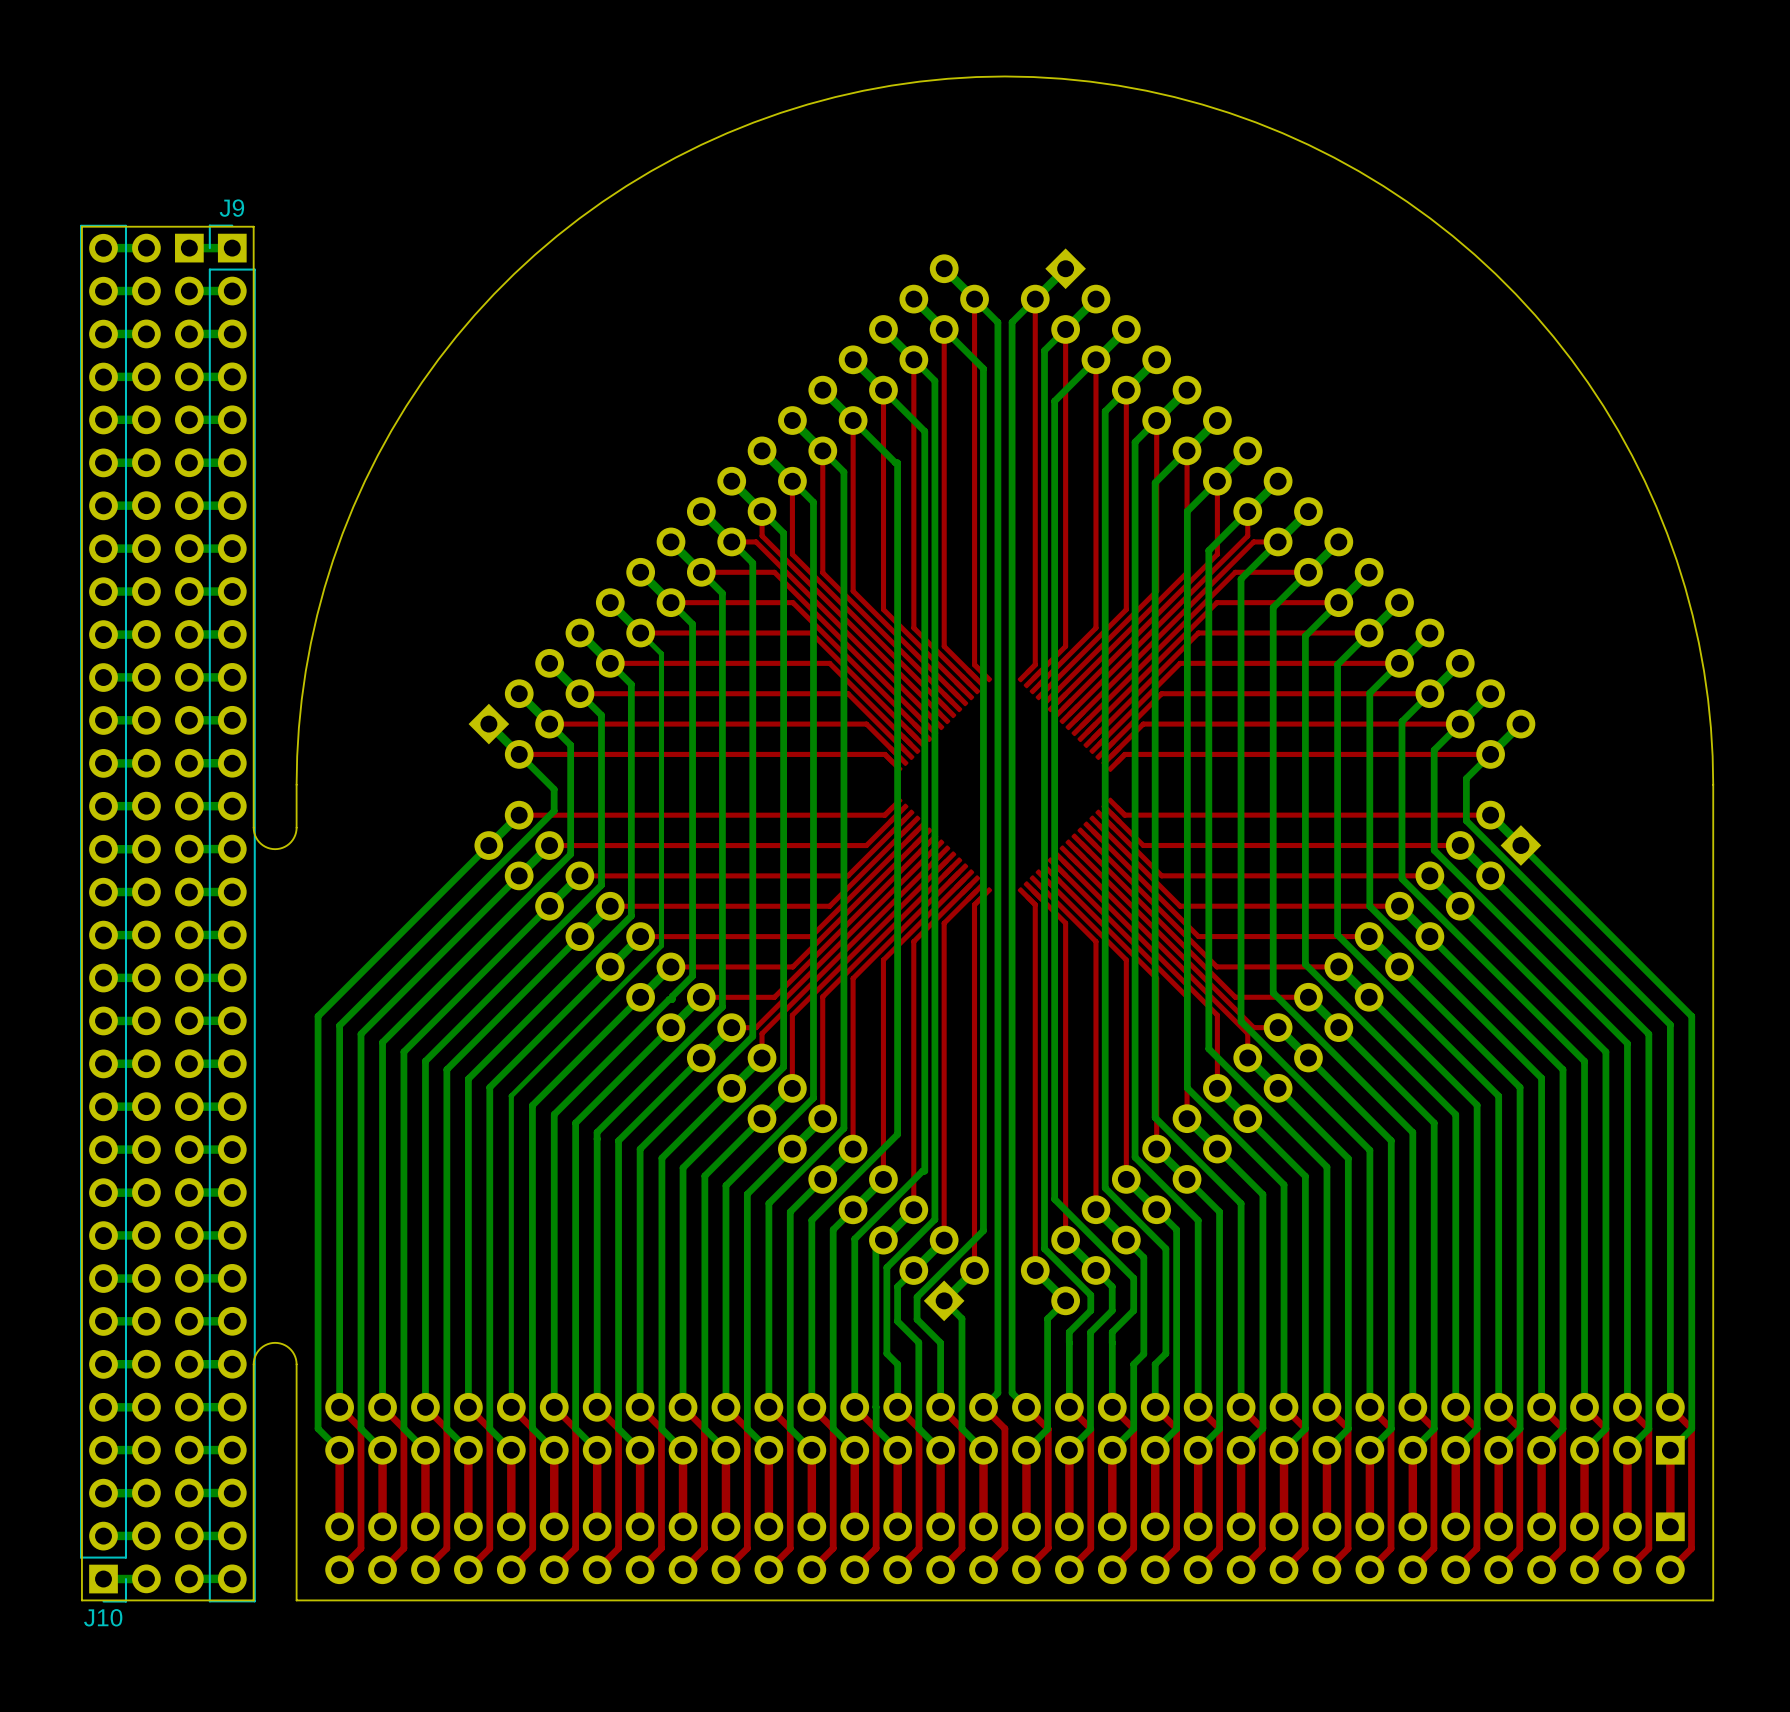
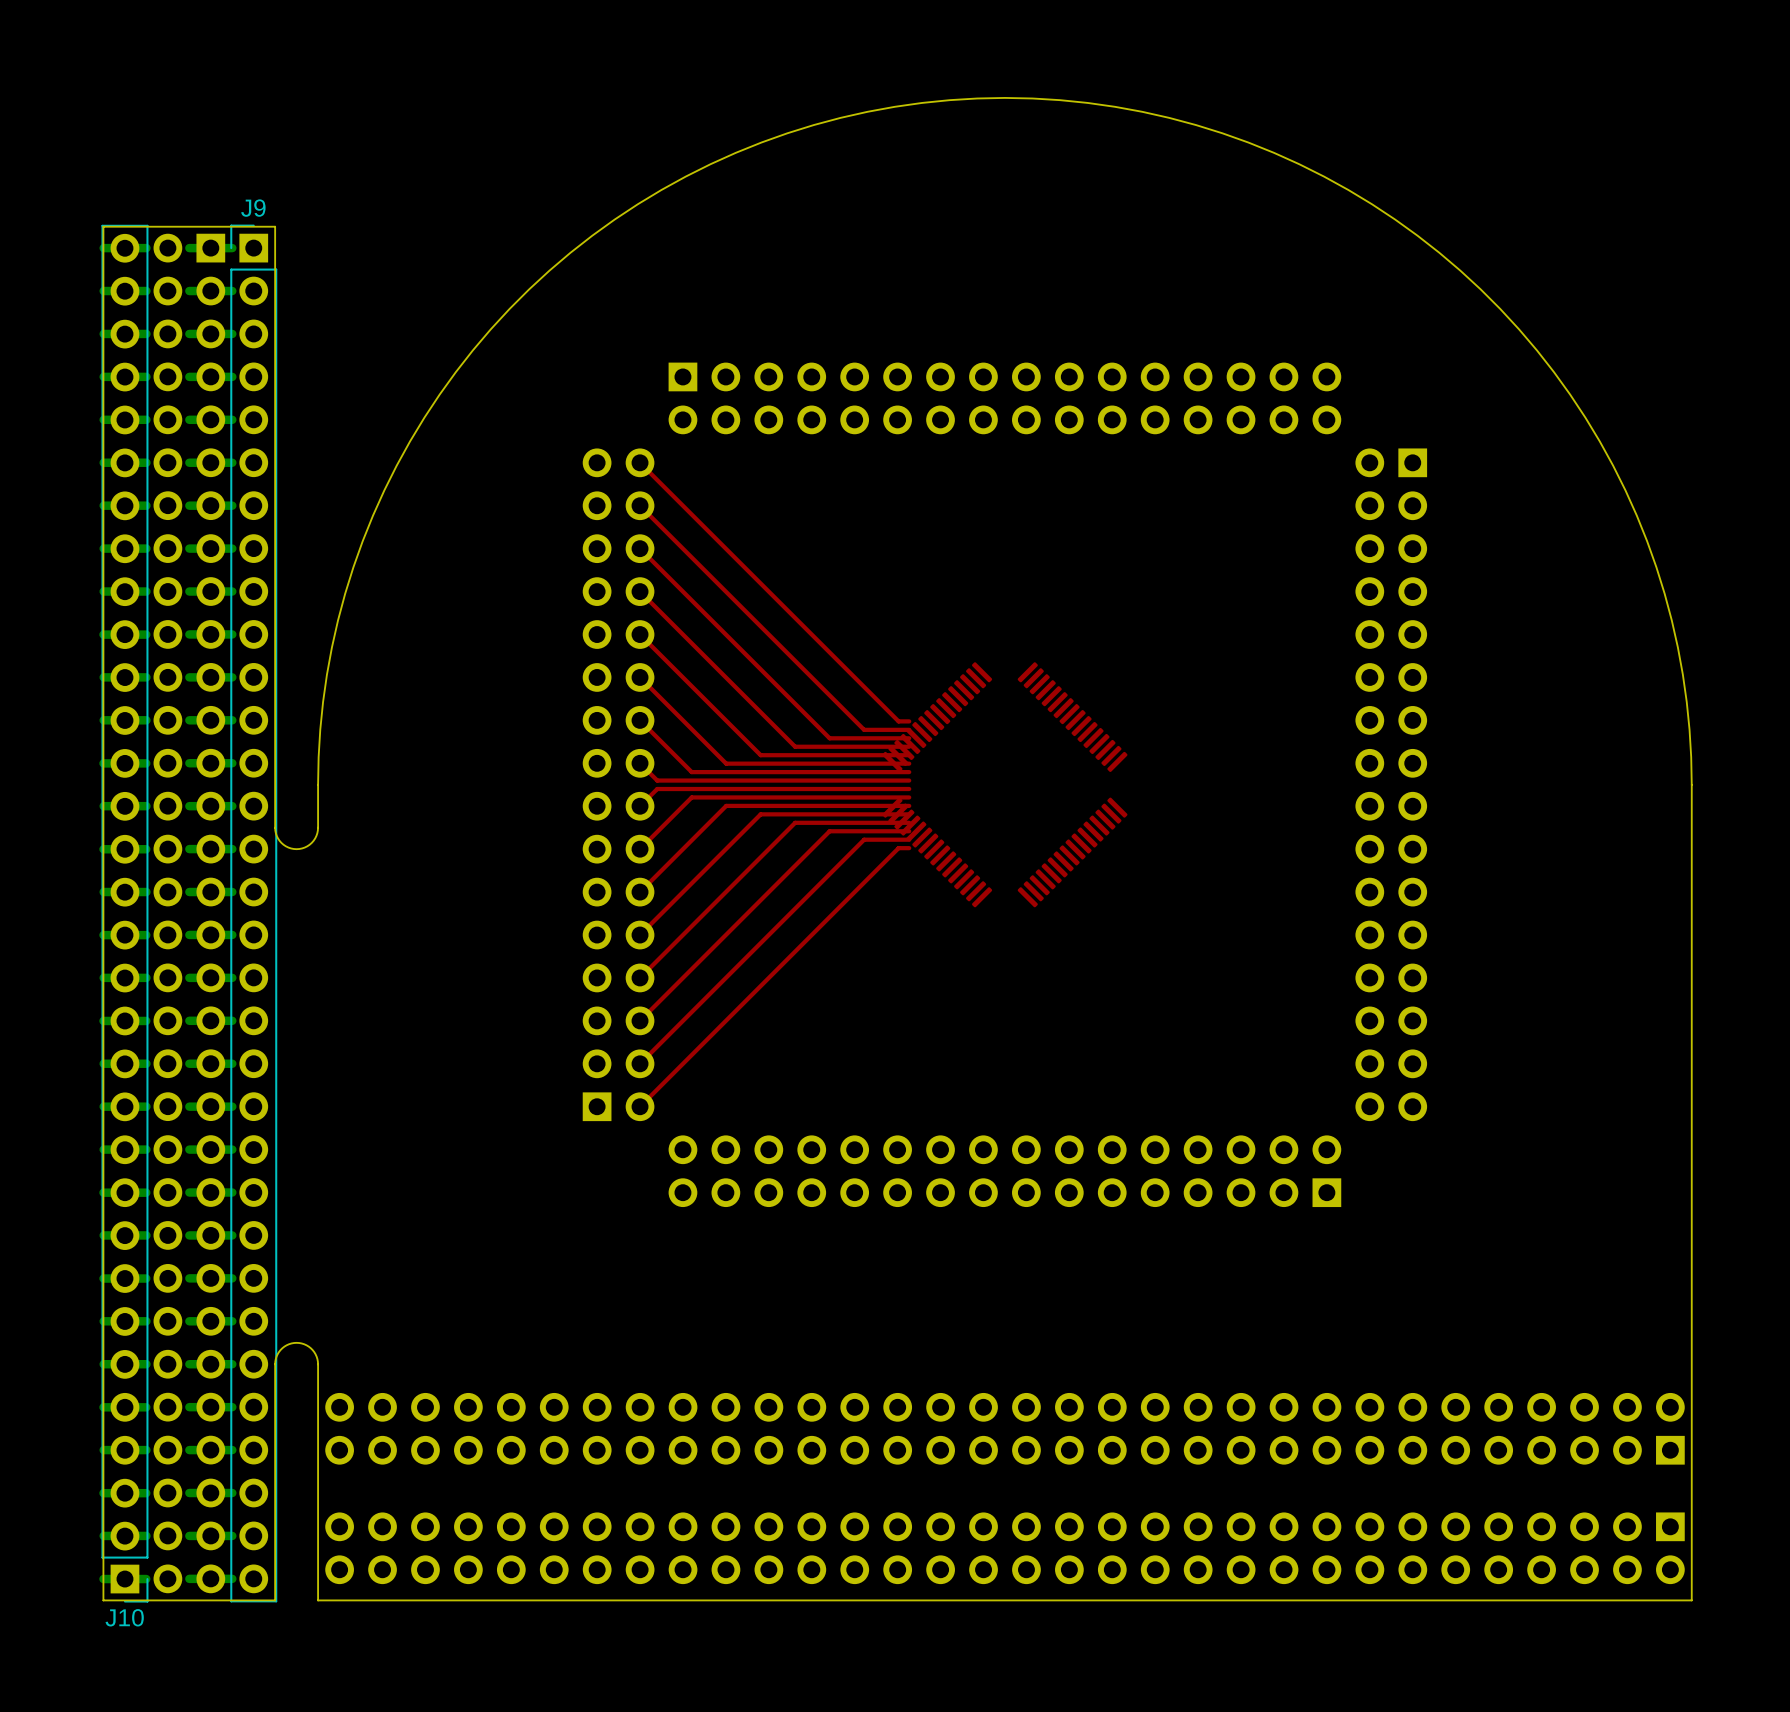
board edge: (103, 226) (81, 226) (81, 1600) (103, 1600) -> (103, 226) (103, 1600)
board edge: (253, 226) (253, 827) (255, 835) (260, 843) (275, 849) (287, 845) (295, 832) (297, 756) (301, 699) (310, 643) (324, 587) (353, 507) (377, 455) (406, 406) (438, 359) (474, 315) (535, 254) (579, 218) (626, 186) (701, 144) (780, 112) (835, 97) (891, 85) (947, 78) (1004, 76) (1061, 78) (1118, 85) (1174, 97) (1229, 112) (1308, 144) (1359, 171) (1407, 201) (1452, 236) (1495, 273) (1535, 315) (1571, 359) (1603, 406) (1632, 455) (1656, 507) (1676, 560) (1692, 615) (1704, 671) (1710, 727) (1713, 784) (1713, 1600) (1691, 1600) -> (253, 226) (275, 226) (275, 827) (276, 835) (281, 842) (288, 847) (296, 849) (304, 847) (311, 842) (317, 830) (318, 757) (323, 701) (331, 647) (345, 593) (373, 515) (410, 441) (439, 394) (472, 350) (529, 289) (570, 252) (614, 219) (661, 189) (710, 164) (761, 142) (813, 125) (867, 111) (922, 102) (977, 98) (1032, 98) (1115, 106) (1169, 117) (1222, 133) (1274, 152) (1324, 176) (1372, 204) (1417, 235) (1480, 289) (1519, 329) (1554, 372) (1585, 417) (1613, 465) (1636, 515) (1656, 567) (1671, 620) (1682, 674) (1689, 729) (1691, 784) (1691, 1600)
bottom track: (944, 268) (997, 322) (997, 1392) (983, 1407) -> none
bottom track: (1065, 268) (1012, 322) (1012, 1392) (1026, 1407) -> none
bottom track: (913, 299) (983, 368) (983, 1230) (917, 1297) (917, 1319) (940, 1342) (940, 1407) -> none
top track: (974, 299) (974, 664) (982, 672) -> none
top track: (1035, 299) (1035, 664) (1027, 672) -> none
bottom track: (1095, 299) (1044, 350) (1044, 1248) (1090, 1295) (1090, 1310) (1069, 1332) (1069, 1342) -> none
bottom track: (883, 329) (934, 380) (934, 1219) (886, 1267) (886, 1353) (897, 1364) (897, 1407) -> none
top track: (944, 329) (944, 646) (976, 678) -> none
top track: (1065, 329) (1065, 646) (1033, 678) -> none
bottom track: (1126, 329) (1054, 401) (1054, 1199) (1133, 1278) (1133, 1310) (1112, 1332) (1112, 1342) -> none
bottom track: (853, 359) (924, 431) (924, 1171) (922, 1171) (854, 1238) (854, 1407) -> none
top track: (913, 359) (913, 627) (970, 684) -> none
top track: (1095, 359) (1095, 627) (1039, 684) -> none
bottom track: (1156, 359) (1105, 411) (1105, 1188) (1165, 1248) (1165, 1353) (1155, 1364) (1155, 1407) -> none
bottom track: (822, 390) (895, 462) (897, 462) (897, 1134) (811, 1220) (811, 1407) -> none
top track: (883, 390) (883, 609) (964, 690) -> none
top track: (1126, 390) (1126, 609) (1045, 690) -> none
bottom track: (1187, 390) (1135, 442) (1135, 1157) (1198, 1220) (1198, 1407) -> none
part: none -> (1004, 398)
bottom track: (792, 420) (843, 472) (843, 1128) (768, 1203) (768, 1407) -> none
top track: (853, 420) (853, 591) (958, 696) -> none
top track: (1156, 420) (1156, 591) (1051, 696) -> none
bottom track: (1217, 420) (1155, 482) (1155, 1117) (1241, 1203) (1241, 1407) -> none
bottom track: (762, 450) (813, 502) (813, 1098) (725, 1185) (725, 1407) -> none
top track: (822, 450) (822, 572) (952, 702) -> none
top track: (1187, 450) (1187, 572) (1057, 702) -> none
bottom track: (1247, 450) (1187, 511) (1187, 1088) (1284, 1184) (1284, 1407) -> none
top track: none -> (640, 462) (898, 721) (909, 721)
bottom track: (731, 481) (783, 533) (783, 1067) (683, 1167) (683, 1407) -> none
top track: (792, 481) (792, 554) (946, 708) -> none
top track: (1217, 481) (1217, 554) (1063, 708) -> none
bottom track: (1278, 481) (1208, 550) (1208, 1048) (1326, 1167) (1326, 1407) -> none
top track: none -> (640, 505) (864, 729) (909, 729)
part: (1278, 508) -> none
bottom track: (701, 511) (752, 563) (752, 1036) (640, 1149) (640, 1407) -> none
part: (728, 511) -> none
top track: (762, 511) (762, 535) (940, 714) -> none
top track: (1247, 511) (1247, 535) (1069, 714) -> none
bottom track: (1308, 511) (1241, 579) (1241, 1021) (1369, 1150) (1369, 1407) -> none
bottom track: (671, 541) (722, 593) (722, 1007) (597, 1132) (597, 1407) -> none
top track: (731, 541) (756, 541) (934, 720) -> none
top track: (1278, 541) (1253, 541) (1075, 720) -> none
bottom track: (1338, 541) (1273, 607) (1273, 992) (1412, 1132) (1412, 1407) -> none
top track: none -> (640, 548) (829, 738) (909, 738)
bottom track: (640, 572) (692, 624) (692, 976) (672, 996) (672, 999) (669, 999) (554, 1114) (554, 1407) -> none
top track: (701, 572) (774, 572) (928, 726) -> none
top track: (1308, 572) (1235, 572) (1081, 726) -> none
bottom track: (1369, 572) (1305, 636) (1305, 964) (1455, 1114) (1455, 1407) -> none
top track: none -> (640, 591) (795, 746) (909, 746)
bottom track: (610, 602) (661, 653) (661, 945) (511, 1096) -> none
top track: (671, 602) (792, 602) (922, 732) -> none
top track: (1338, 602) (1216, 602) (1087, 732) -> none
bottom track: (1399, 602) (1337, 664) (1337, 935) (1498, 1096) (1498, 1407) -> none
bottom track: (579, 633) (631, 684) (631, 915) (468, 1078) (468, 1407) -> none
top track: (640, 633) (811, 633) (916, 738) -> none
top track: (1369, 633) (1198, 633) (1093, 738) -> none
bottom track: (1429, 633) (1369, 693) (1369, 906) (1541, 1078) (1541, 1407) -> none
top track: none -> (640, 634) (760, 755) (909, 755)
bottom track: (549, 663) (601, 715) (601, 885) (425, 1061) (425, 1407) -> none
top track: (610, 663) (829, 663) (910, 744) -> none
top track: (1399, 663) (1180, 663) (1099, 744) -> none
bottom track: (1460, 663) (1402, 721) (1402, 878) (1584, 1061) (1584, 1407) -> none
top track: none -> (640, 677) (726, 763) (909, 763)
bottom track: (519, 693) (570, 745) (570, 854) (382, 1042) (382, 1407) -> none
top track: (579, 693) (848, 693) (904, 749) -> none
top track: (1429, 693) (1161, 693) (1105, 749) -> none
bottom track: (1490, 693) (1434, 750) (1434, 850) (1627, 1043) (1627, 1407) -> none
top track: none -> (640, 720) (691, 772) (909, 772)
bottom track: (488, 724) (554, 789) (554, 811) (339, 1025) (339, 1407) -> none
top track: (549, 724) (866, 724) (898, 755) -> none
top track: (1460, 724) (1143, 724) (1111, 755) -> none
bottom track: (1520, 724) (1466, 778) (1466, 820) (1670, 1024) (1670, 1407) -> none
top track: (519, 754) (884, 754) (892, 761) -> none
top track: (1490, 754) (1124, 754) (1117, 761) -> none
top track: none -> (640, 763) (657, 780) (909, 780)
part: none -> (618, 784)
part: none -> (1391, 784)
top track: none -> (909, 789) (657, 789) (640, 806)
top track: none -> (909, 797) (691, 797) (640, 849)
top track: none -> (909, 805) (726, 805) (640, 892)
top track: (892, 807) (884, 815) (519, 815) -> none
top track: (1117, 807) (1124, 815) (1490, 815) -> none
top track: (898, 813) (866, 845) (549, 845) -> none
top track: (1111, 813) (1143, 845) (1460, 845) -> none
top track: none -> (909, 814) (760, 814) (640, 935)
bottom track: (519, 815) (318, 1016) (318, 1428) (339, 1450) -> none
bottom track: (1490, 815) (1691, 1016) (1691, 1428) (1670, 1450) -> none
top track: (904, 819) (848, 875) (579, 875) -> none
top track: (1105, 819) (1161, 875) (1429, 875) -> none
top track: none -> (909, 822) (795, 822) (640, 977)
top track: (910, 825) (829, 906) (610, 906) -> none
top track: (1099, 825) (1180, 906) (1399, 906) -> none
top track: none -> (909, 831) (829, 831) (640, 1020)
top track: (916, 831) (811, 936) (640, 936) -> none
top track: (1093, 831) (1198, 936) (1369, 936) -> none
top track: (922, 837) (792, 966) (670, 966) -> none
top track: (1087, 837) (1216, 966) (1338, 966) -> none
top track: none -> (909, 839) (864, 839) (640, 1063)
top track: (928, 843) (774, 997) (701, 997) -> none
top track: (1081, 843) (1235, 997) (1308, 997) -> none
bottom track: (549, 845) (360, 1034) (360, 1428) (382, 1450) -> none
bottom track: (1460, 845) (1648, 1034) (1648, 1428) (1627, 1450) -> none
top track: none -> (909, 848) (898, 848) (640, 1106)
top track: (934, 849) (756, 1027) (731, 1027) -> none
top track: (1075, 849) (1253, 1027) (1278, 1027) -> none
top track: (940, 855) (762, 1033) (762, 1058) -> none
top track: (1069, 855) (1247, 1033) (1247, 1057) -> none
top track: (946, 861) (792, 1015) (792, 1088) -> none
top track: (1063, 861) (1217, 1015) (1217, 1088) -> none
top track: (952, 867) (822, 996) (822, 1118) -> none
top track: (1057, 867) (1187, 996) (1187, 1118) -> none
top track: (958, 873) (853, 978) (853, 1149) -> none
top track: (1051, 873) (1156, 978) (1156, 1149) -> none
bottom track: (579, 875) (403, 1051) (403, 1428) (425, 1450) -> none
bottom track: (1429, 875) (1605, 1051) (1605, 1428) (1584, 1450) -> none
top track: (964, 879) (883, 960) (883, 1179) -> none
top track: (1045, 879) (1126, 959) (1126, 1179) -> none
top track: (970, 885) (913, 941) (913, 1209) -> none
top track: (1039, 885) (1095, 941) (1095, 1209) -> none
top track: (976, 891) (944, 923) (944, 1240) -> none
top track: (1033, 891) (1065, 923) (1065, 1240) -> none
top track: (982, 897) (974, 904) (974, 1270) -> none
top track: (1027, 897) (1035, 904) (1035, 1270) -> none
bottom track: (610, 906) (446, 1069) (446, 1428) (468, 1450) -> none
bottom track: (1399, 906) (1562, 1069) (1562, 1428) (1541, 1450) -> none
J10 position: (103, 913) -> (124, 913)
part position: (167, 913) -> (189, 913)
J9 position: (232, 913) -> (253, 913)
bottom track: (640, 936) (489, 1087) (489, 1428) (511, 1450) -> none
bottom track: (1369, 936) (1520, 1087) (1520, 1428) (1498, 1450) -> none
bottom track: (670, 966) (532, 1105) (532, 1428) (554, 1450) -> none
bottom track: (1338, 966) (1477, 1105) (1477, 1428) (1455, 1450) -> none
bottom track: (701, 997) (575, 1123) (575, 1428) (597, 1450) -> none
bottom track: (1308, 997) (1434, 1123) (1434, 1428) (1412, 1450) -> none
bottom track: (731, 1027) (618, 1140) (618, 1428) (640, 1450) -> none
bottom track: (1278, 1027) (1391, 1140) (1391, 1428) (1369, 1450) -> none
bottom track: (1247, 1057) (1348, 1158) (1348, 1428) (1326, 1450) -> none
part: (1281, 1057) -> none
bottom track: (762, 1058) (661, 1158) (661, 1429) (683, 1450) -> none
part: (731, 1061) -> none
bottom track: (792, 1088) (704, 1175) (704, 1429) (725, 1450) -> none
bottom track: (1217, 1088) (1305, 1176) (1305, 1428) (1284, 1450) -> none
bottom track: (511, 1096) (511, 1407) -> none
bottom track: (822, 1118) (747, 1194) (747, 1428) (768, 1450) -> none
bottom track: (1187, 1118) (1262, 1194) (1262, 1428) (1241, 1450) -> none
bottom track: (853, 1149) (790, 1211) (790, 1428) (811, 1450) -> none
bottom track: (1156, 1149) (1219, 1211) (1219, 1428) (1198, 1450) -> none
part: none -> (1004, 1171)
bottom track: (883, 1179) (833, 1229) (833, 1428) (854, 1450) -> none
bottom track: (1126, 1179) (1176, 1229) (1176, 1428) (1155, 1450) -> none
bottom track: (913, 1209) (875, 1247) (876, 1428) (897, 1450) -> none
bottom track: (1095, 1209) (1143, 1257) (1143, 1354) (1133, 1364) (1133, 1428) (1112, 1450) -> none
bottom track: (944, 1240) (897, 1286) (897, 1321) (918, 1342) (918, 1428) (940, 1450) -> none
bottom track: (1065, 1240) (1112, 1286) (1112, 1310) (1090, 1332) (1090, 1429) (1069, 1450) -> none
bottom track: (974, 1270) (944, 1300) (961, 1318) (961, 1428) (983, 1450) -> none
bottom track: (1035, 1270) (1065, 1300) (1047, 1318) (1047, 1429) (1026, 1450) -> none
bottom track: (1069, 1342) (1069, 1407) -> none
bottom track: (1112, 1342) (1112, 1407) -> none
top track: (339, 1407) (360, 1428) (360, 1548) (339, 1569) -> none
top track: (382, 1407) (403, 1428) (403, 1548) (382, 1569) -> none
top track: (425, 1407) (446, 1428) (446, 1548) (425, 1569) -> none
top track: (468, 1407) (489, 1428) (489, 1548) (468, 1569) -> none
top track: (511, 1407) (532, 1428) (532, 1548) (511, 1569) -> none
top track: (554, 1407) (575, 1428) (575, 1548) (554, 1569) -> none
top track: (597, 1407) (618, 1428) (618, 1548) (597, 1569) -> none
top track: (640, 1407) (661, 1428) (661, 1548) (640, 1569) -> none
top track: (683, 1407) (704, 1428) (704, 1548) (683, 1569) -> none
top track: (725, 1407) (747, 1428) (747, 1548) (725, 1569) -> none
top track: (768, 1407) (790, 1428) (790, 1548) (768, 1569) -> none
top track: (811, 1407) (833, 1428) (833, 1548) (811, 1569) -> none
top track: (854, 1407) (876, 1428) (876, 1548) (854, 1569) -> none
top track: (897, 1407) (919, 1428) (919, 1548) (897, 1569) -> none
top track: (940, 1407) (961, 1428) (961, 1548) (940, 1569) -> none
top track: (983, 1407) (1004, 1428) (1004, 1548) (983, 1569) -> none
top track: (1026, 1407) (1048, 1429) (1048, 1547) (1026, 1569) -> none
top track: (1069, 1407) (1090, 1428) (1090, 1548) (1069, 1569) -> none
top track: (1112, 1407) (1133, 1428) (1133, 1548) (1112, 1569) -> none
top track: (1155, 1407) (1176, 1428) (1176, 1548) (1155, 1569) -> none
top track: (1198, 1407) (1219, 1428) (1219, 1548) (1198, 1569) -> none
top track: (1241, 1407) (1262, 1428) (1262, 1548) (1241, 1569) -> none
top track: (1284, 1407) (1305, 1428) (1305, 1548) (1284, 1569) -> none
top track: (1326, 1407) (1348, 1428) (1348, 1548) (1326, 1569) -> none
top track: (1369, 1407) (1391, 1428) (1391, 1548) (1369, 1569) -> none
top track: (1412, 1407) (1433, 1428) (1433, 1548) (1412, 1569) -> none
top track: (1455, 1407) (1476, 1428) (1476, 1548) (1455, 1569) -> none
top track: (1498, 1407) (1519, 1428) (1519, 1548) (1498, 1569) -> none
top track: (1541, 1407) (1562, 1428) (1562, 1548) (1541, 1569) -> none
top track: (1584, 1407) (1605, 1428) (1605, 1548) (1584, 1569) -> none
top track: (1627, 1407) (1648, 1428) (1648, 1548) (1627, 1569) -> none
top track: (1670, 1407) (1691, 1428) (1691, 1548) (1670, 1569) -> none
top track: (339, 1450) (339, 1526) -> none
top track: (382, 1450) (382, 1526) -> none
top track: (425, 1450) (425, 1526) -> none
top track: (468, 1450) (468, 1526) -> none
top track: (511, 1450) (511, 1514) -> none
top track: (554, 1450) (554, 1526) -> none
top track: (597, 1450) (597, 1526) -> none
top track: (640, 1450) (640, 1526) -> none
top track: (683, 1450) (683, 1526) -> none
top track: (725, 1450) (725, 1526) -> none
top track: (768, 1450) (768, 1526) -> none
top track: (811, 1450) (811, 1526) -> none
top track: (854, 1450) (854, 1526) -> none
top track: (897, 1450) (897, 1526) -> none
top track: (940, 1450) (940, 1526) -> none
top track: (983, 1450) (983, 1526) -> none
top track: (1026, 1450) (1026, 1526) -> none
top track: (1069, 1450) (1069, 1526) -> none
top track: (1112, 1450) (1112, 1526) -> none
top track: (1155, 1450) (1155, 1526) -> none
top track: (1198, 1450) (1198, 1526) -> none
top track: (1241, 1450) (1241, 1526) -> none
top track: (1284, 1450) (1284, 1526) -> none
top track: (1326, 1450) (1326, 1526) -> none
top track: (1369, 1450) (1369, 1526) -> none
top track: (1412, 1450) (1412, 1526) -> none
top track: (1455, 1450) (1455, 1526) -> none
top track: (1498, 1450) (1498, 1526) -> none
top track: (1541, 1450) (1541, 1526) -> none
top track: (1584, 1450) (1584, 1526) -> none
top track: (1627, 1450) (1627, 1526) -> none
top track: (1670, 1450) (1670, 1526) -> none
board edge: (318, 1600) (296, 1600) (296, 1361) (289, 1348) (275, 1342) (260, 1348) (253, 1361) (253, 1600) -> (318, 1600) (317, 1361) (310, 1348) (296, 1342) (282, 1348) (275, 1361) (275, 1600) (253, 1600)

